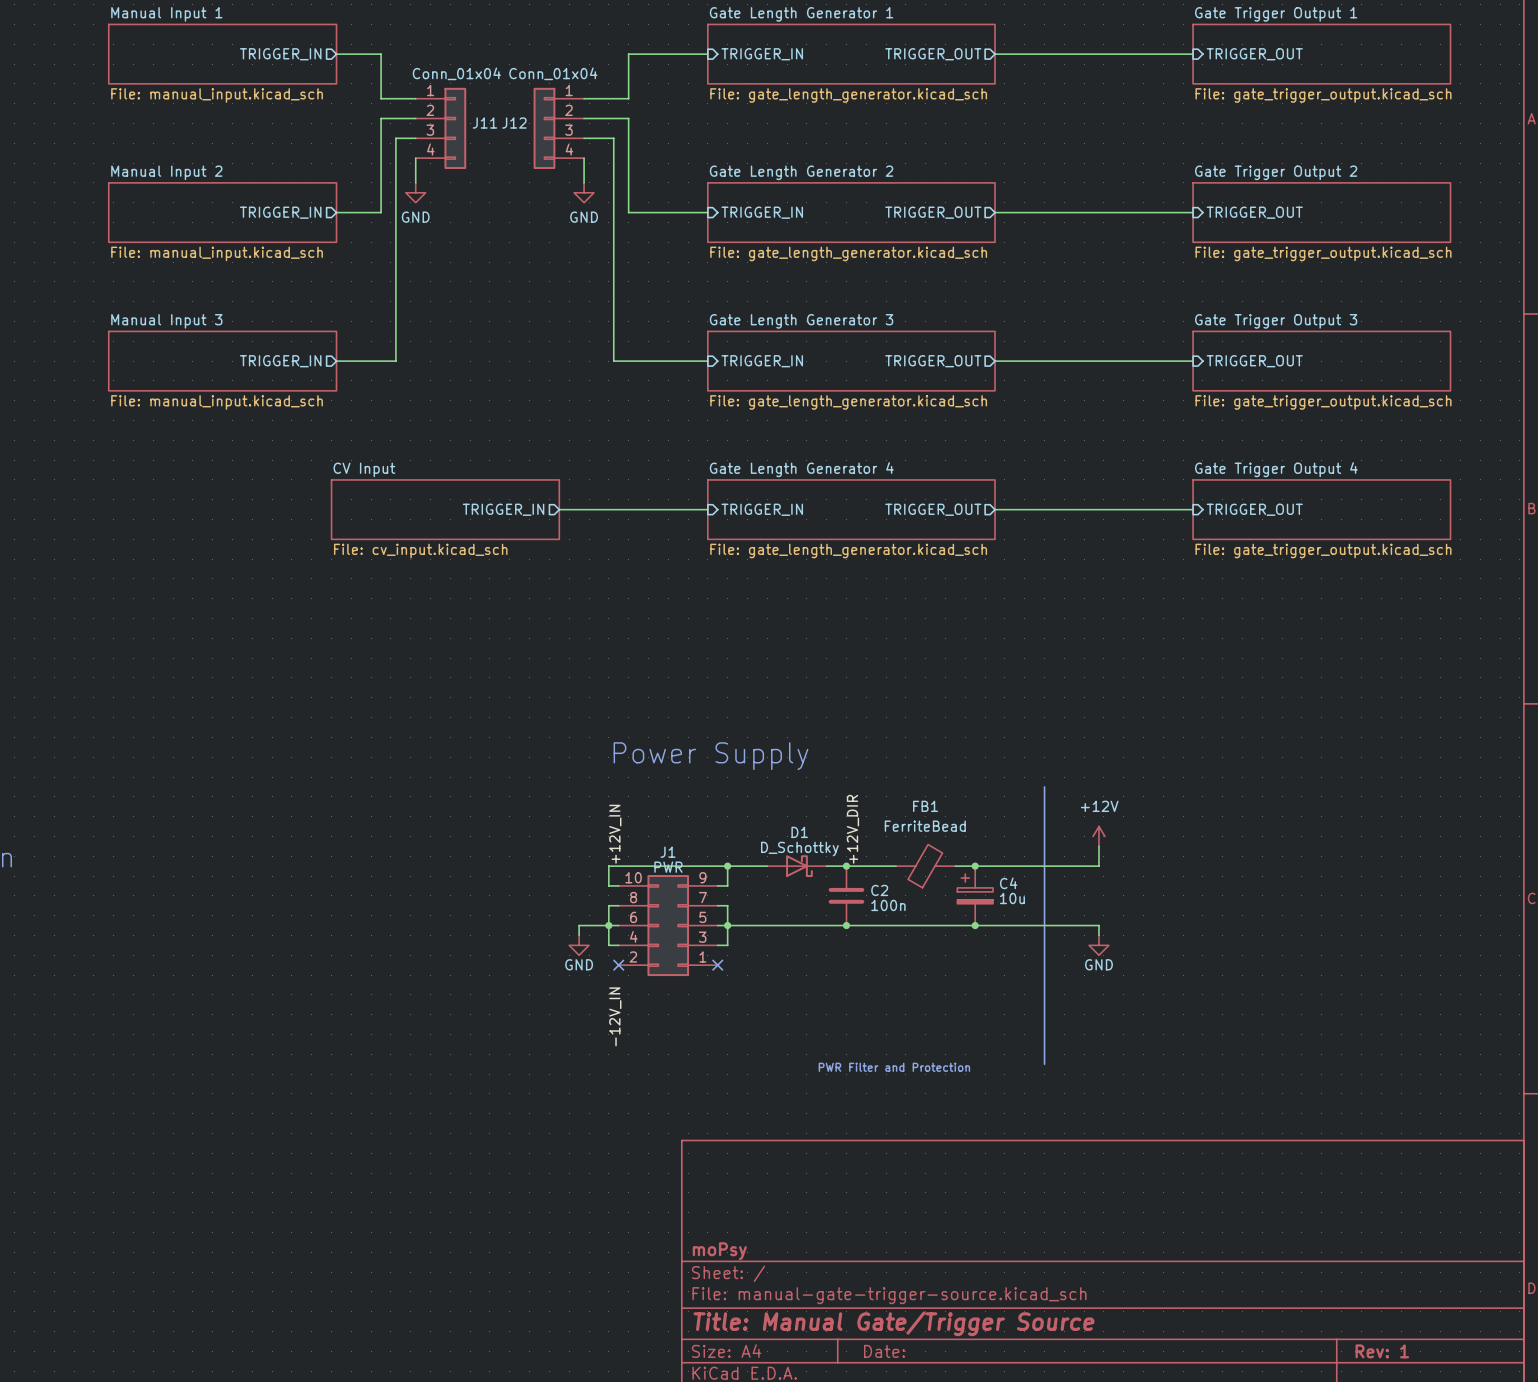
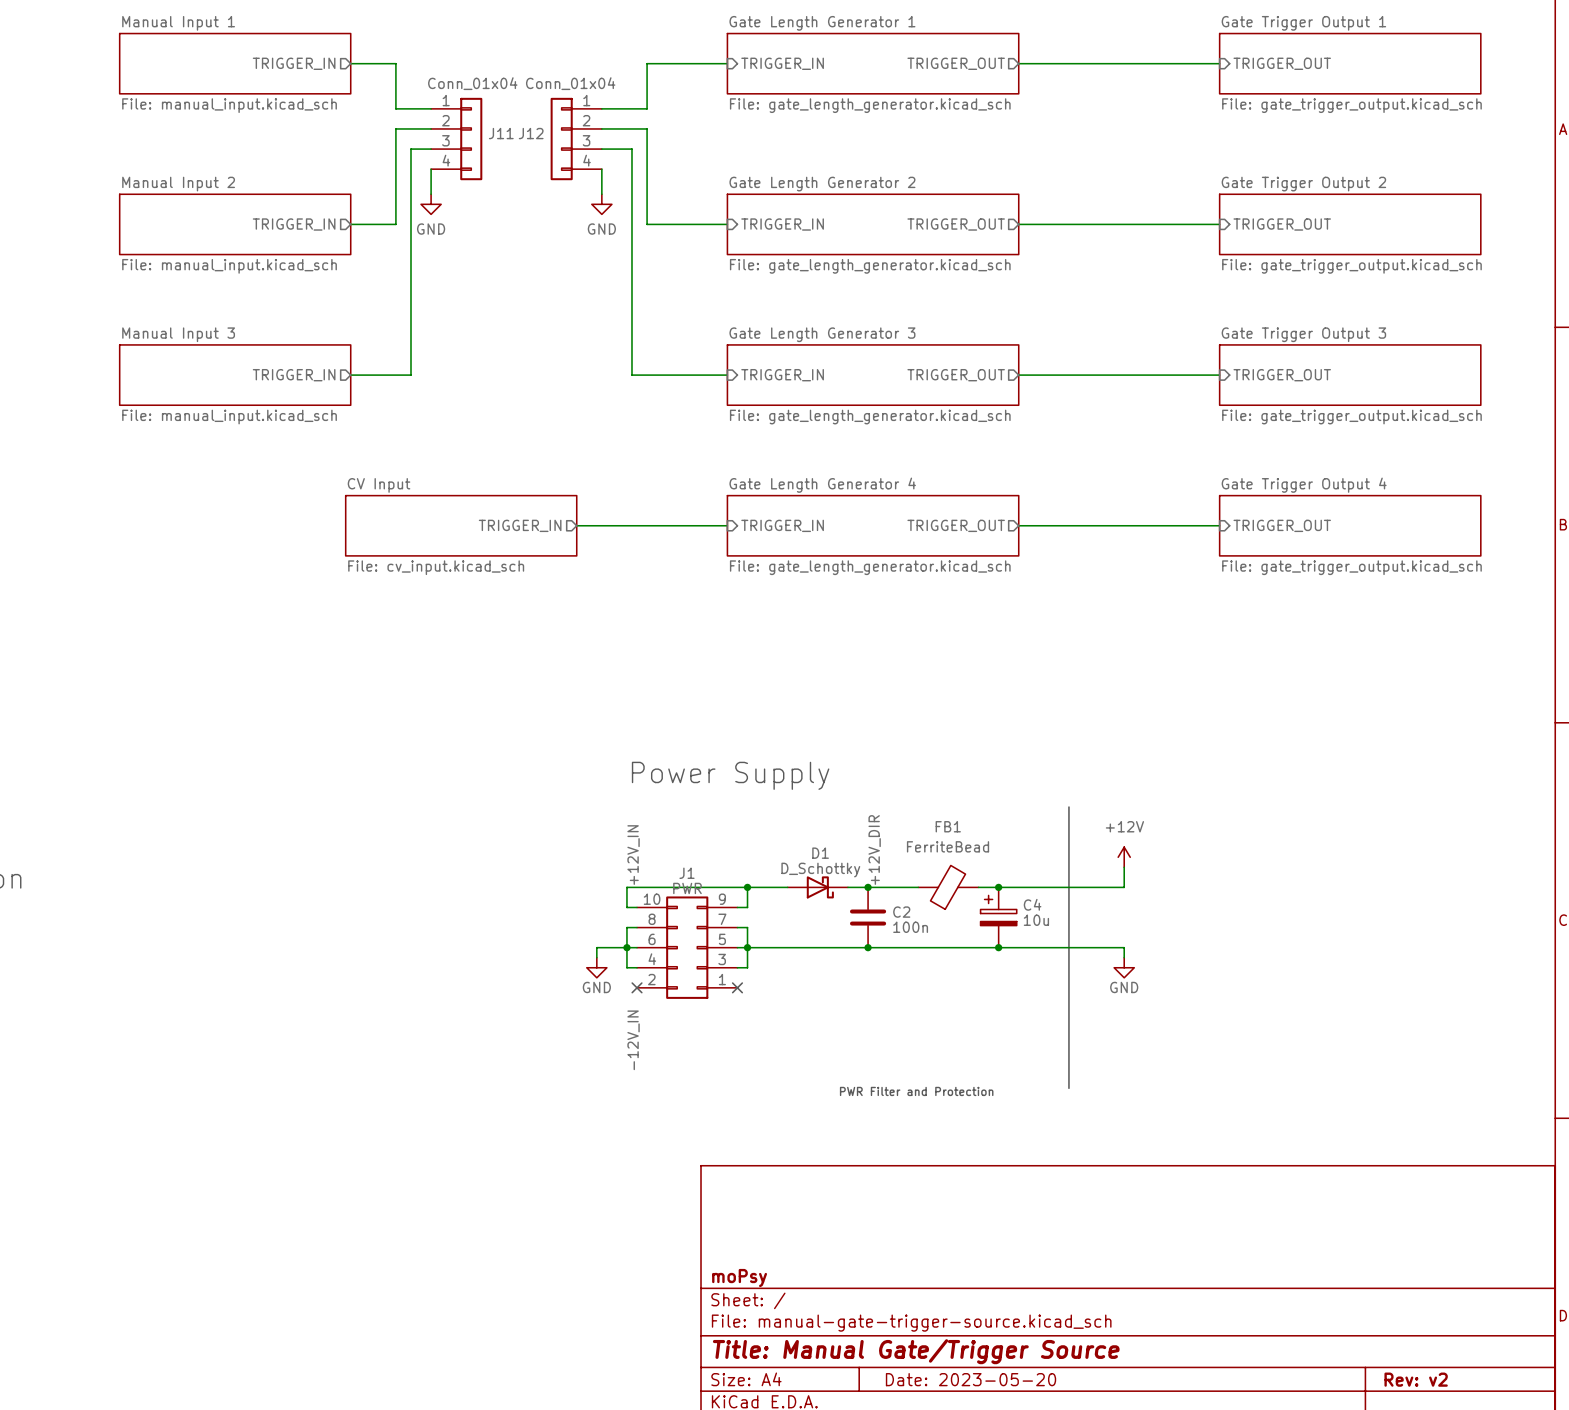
title block: Date: (884, 1351) -> Date: 2023-05-20 (971, 1379)
title block: Rev: 1 (1382, 1351) -> Rev: v2 (1416, 1379)

